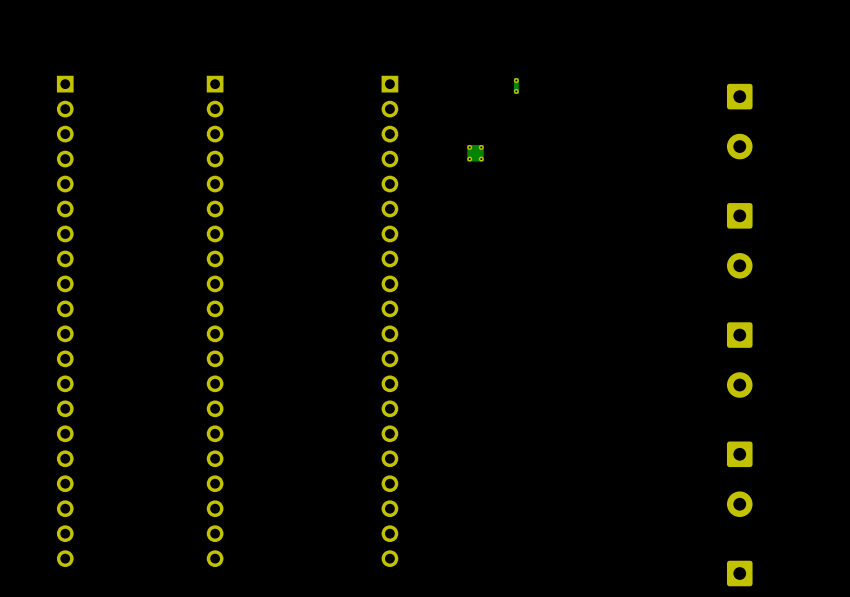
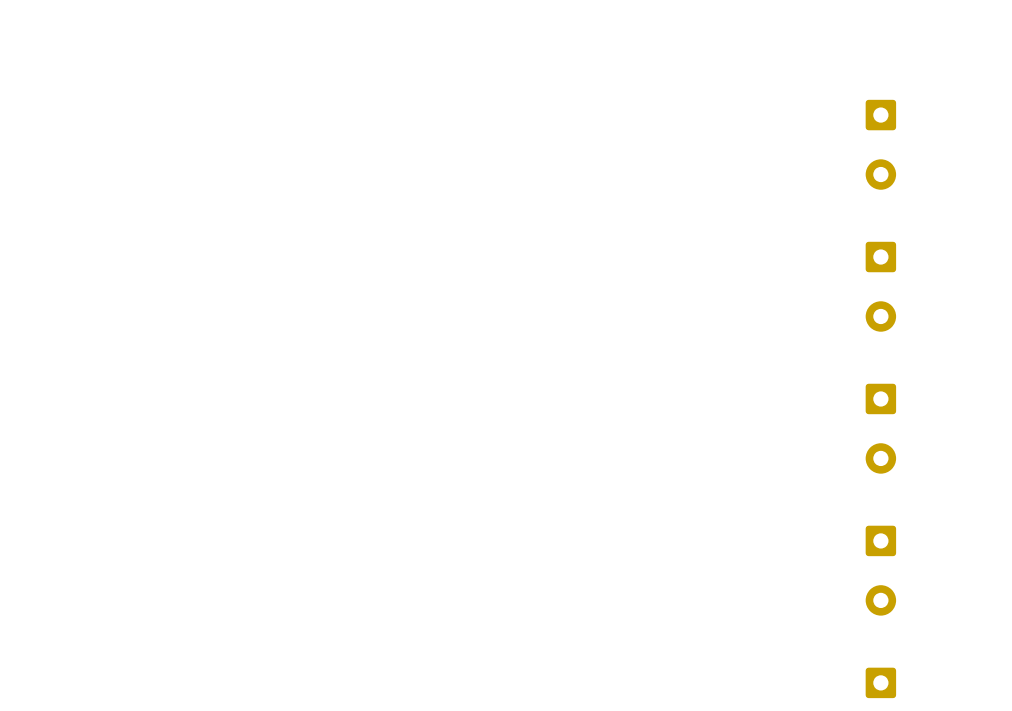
part: (516, 85) -> none
part: (475, 153) -> none
part: (65, 321) -> none
part: (215, 321) -> none
part: (389, 321) -> none

